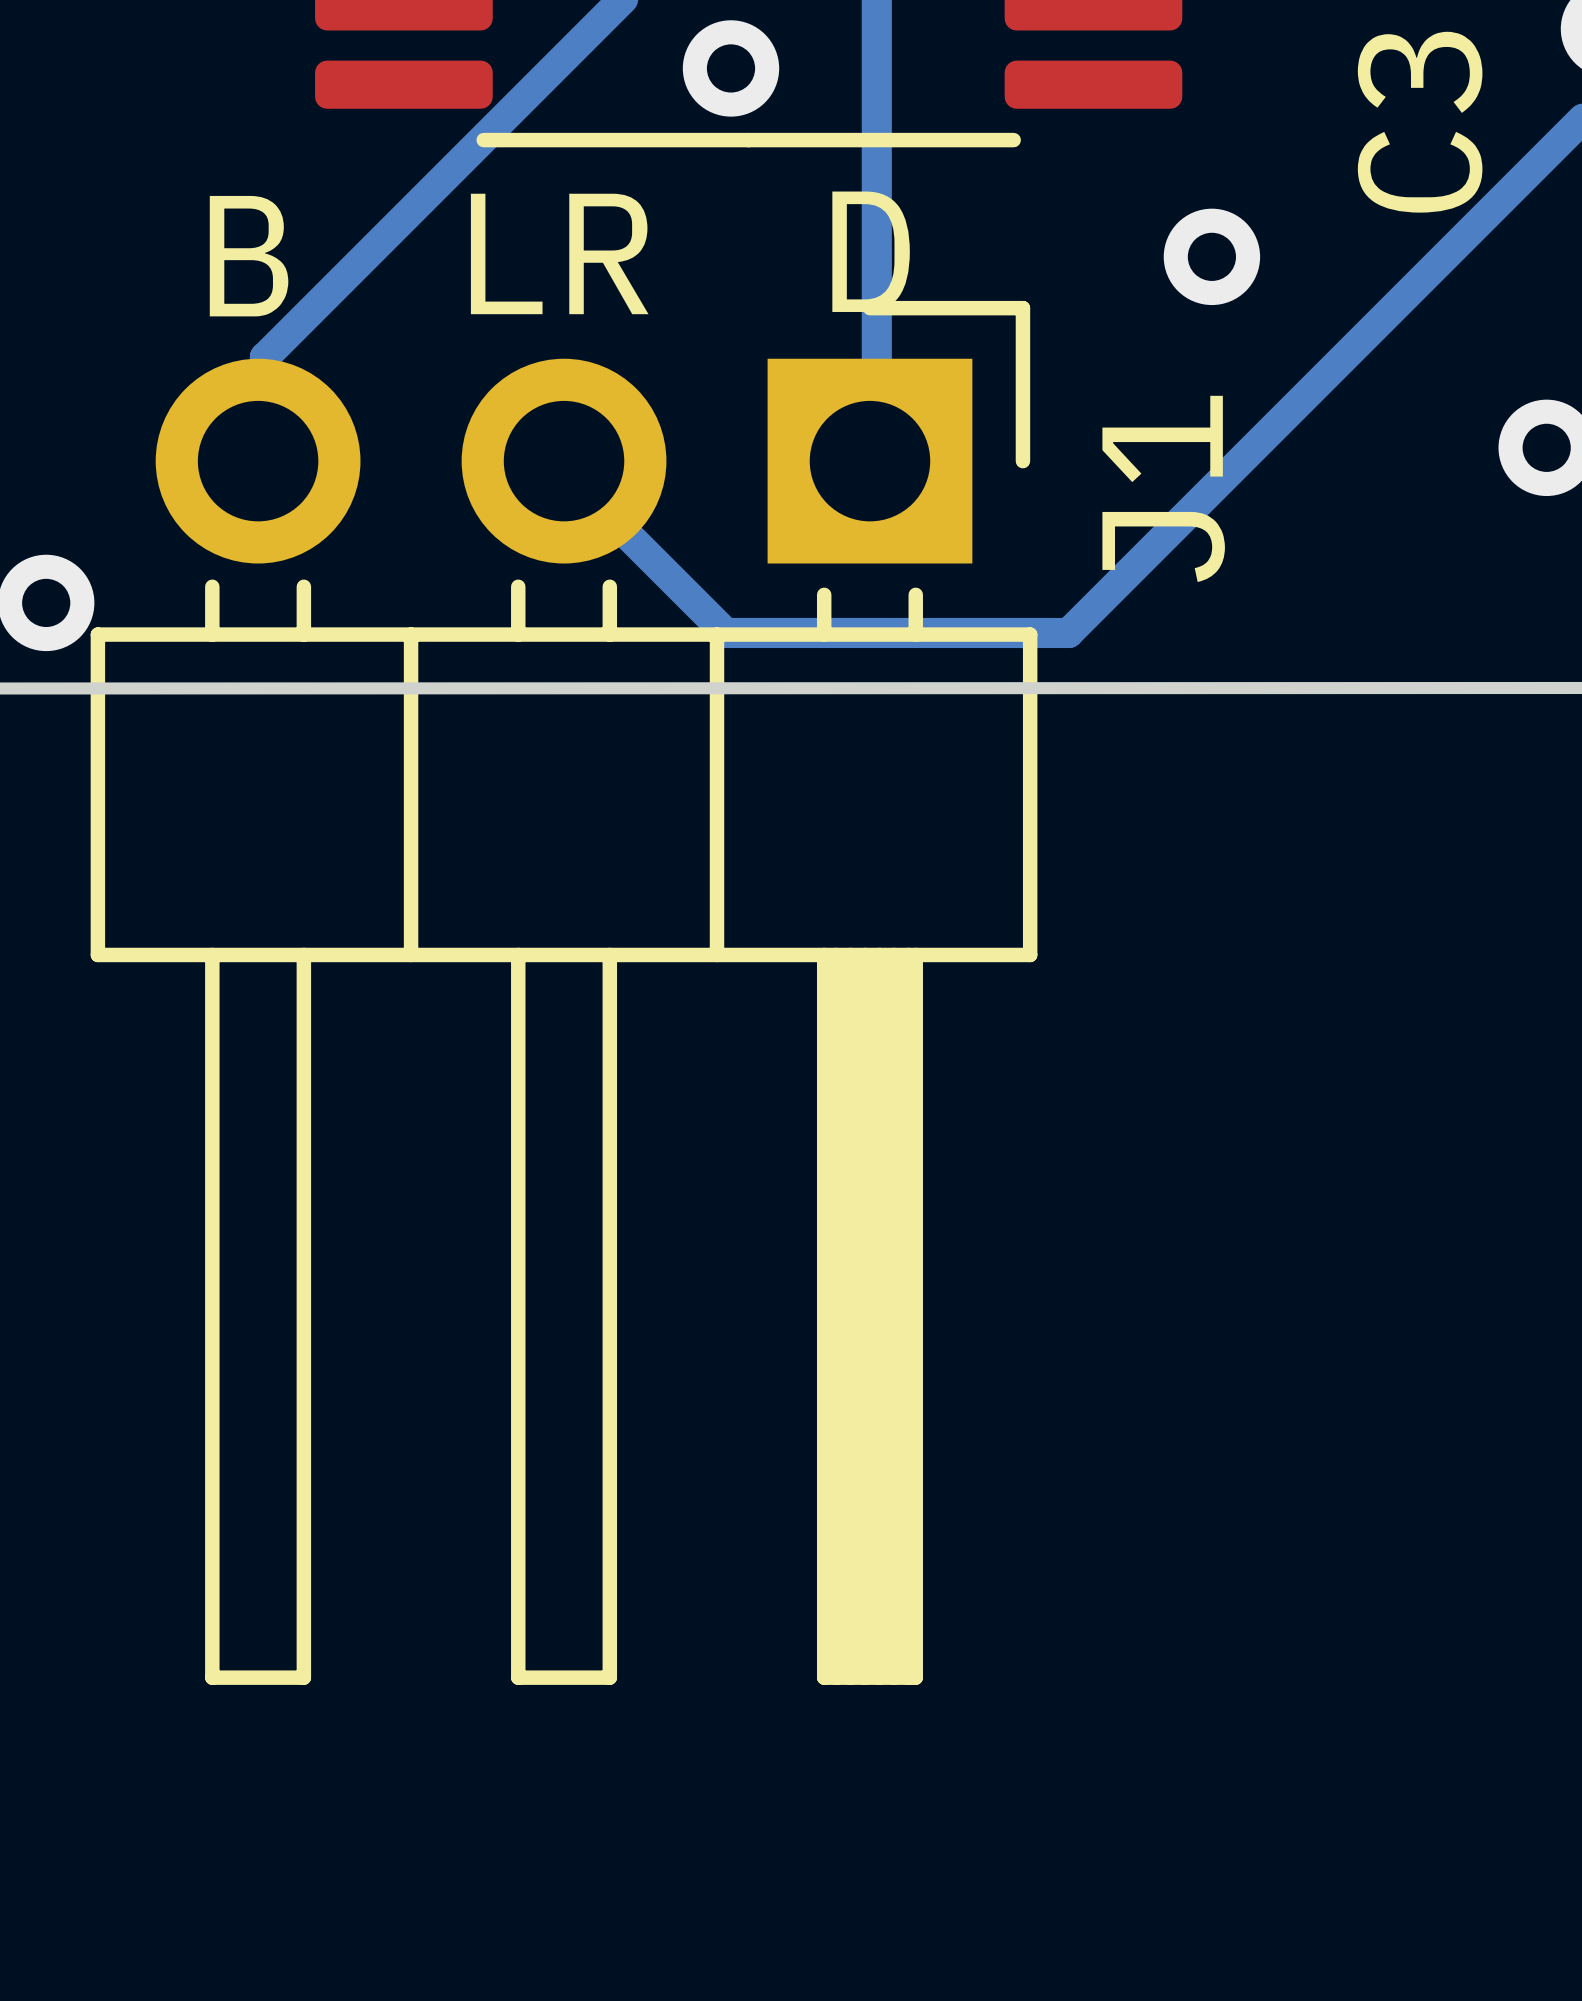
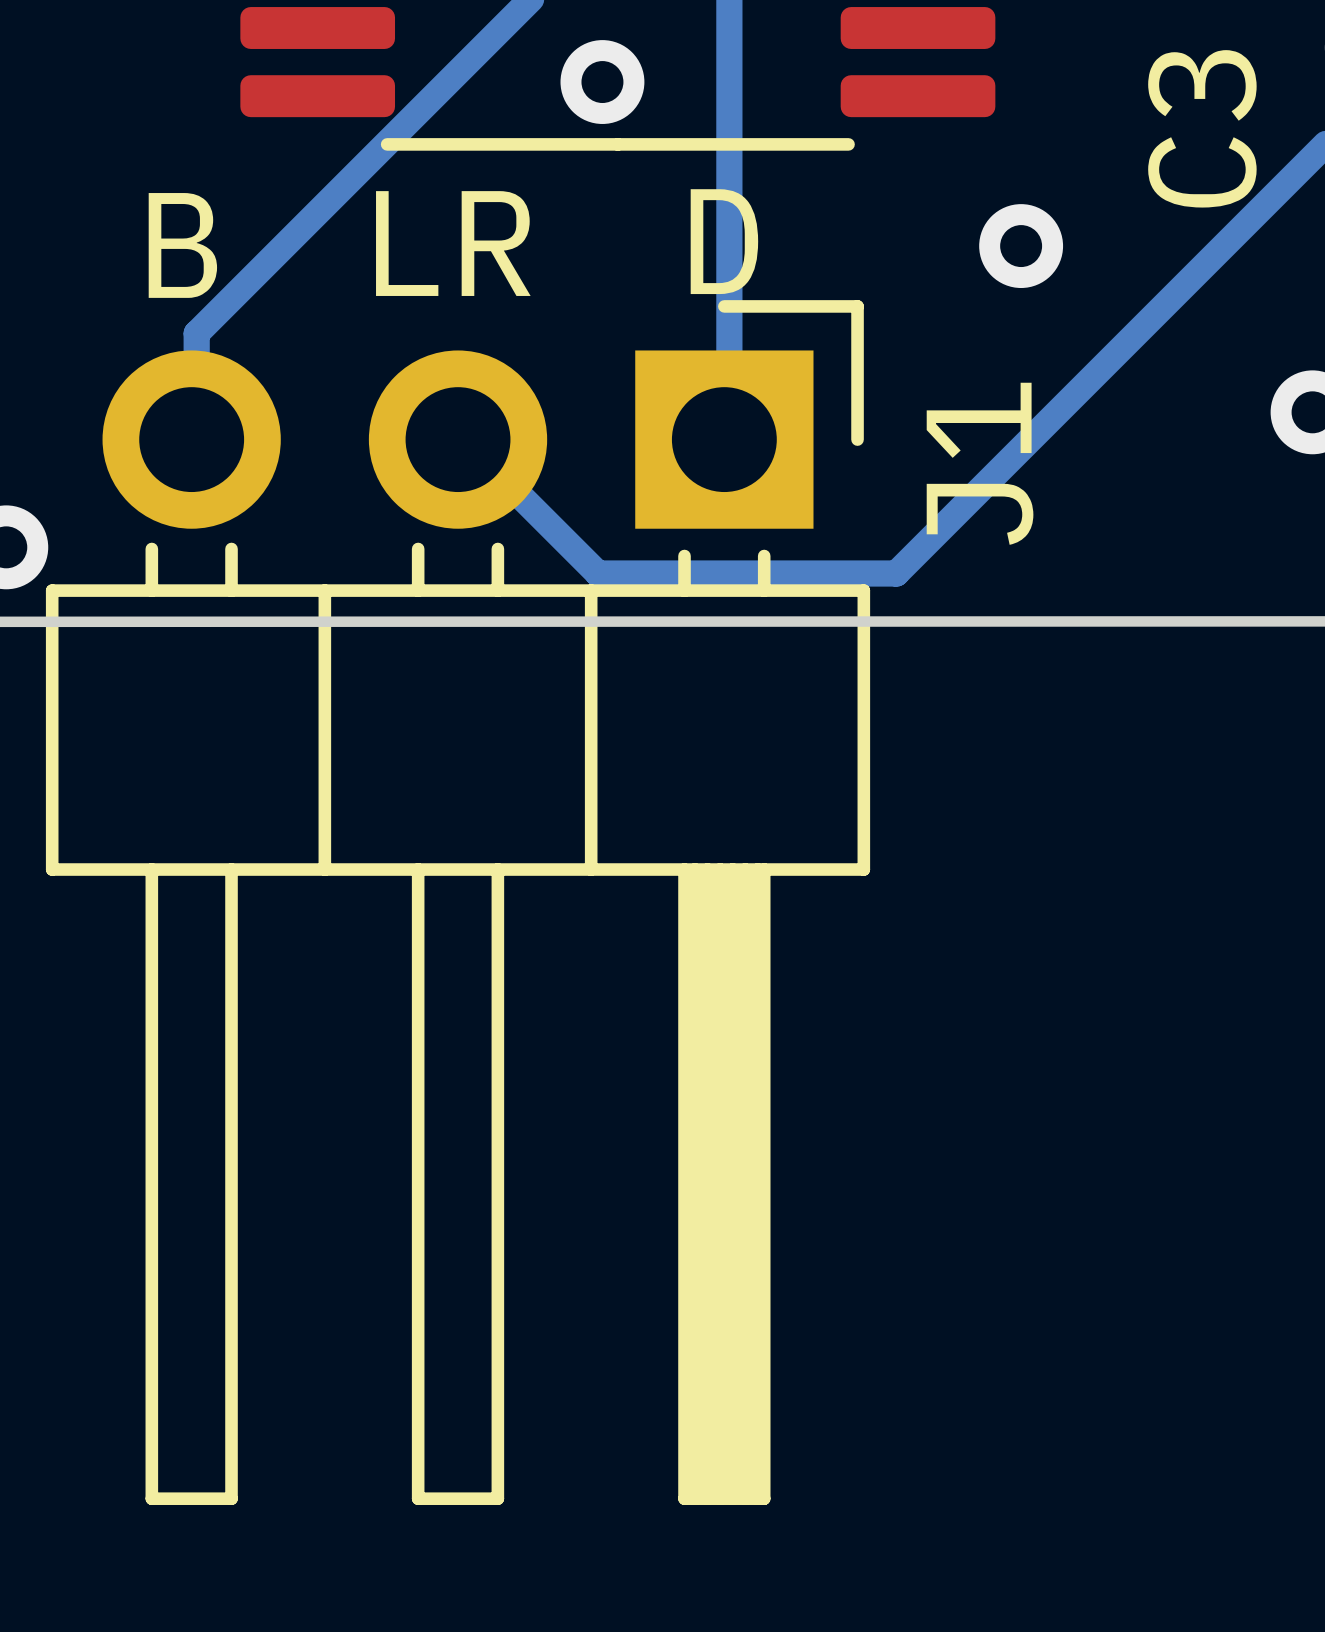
J1 position: (564, 992) -> (458, 902)

